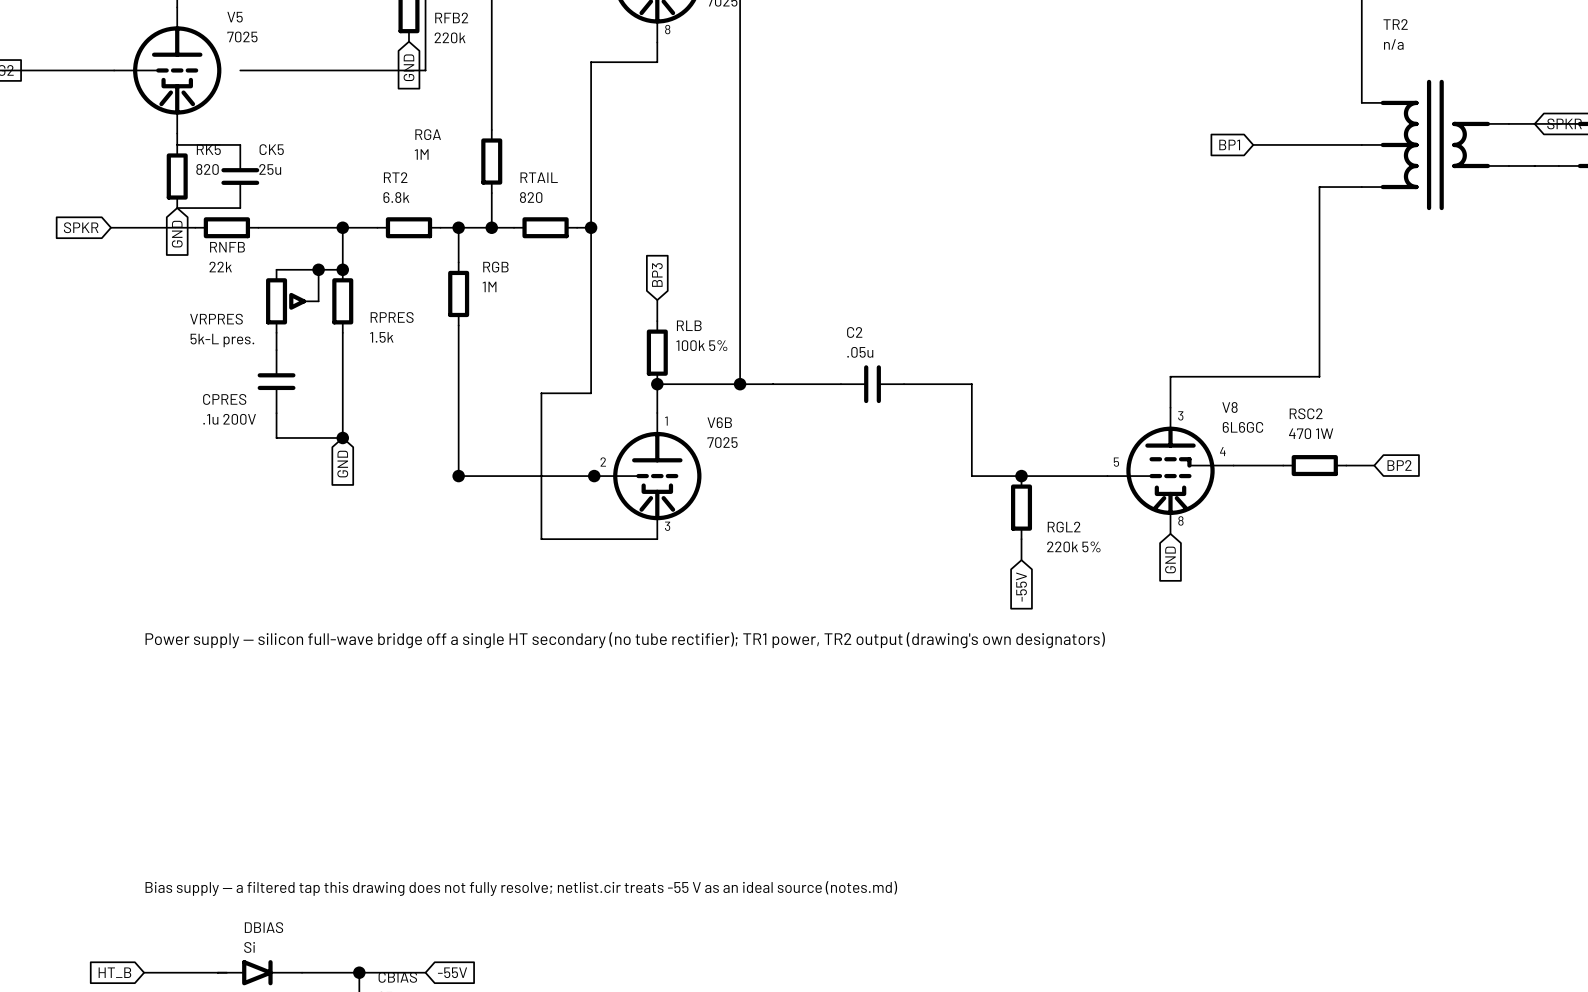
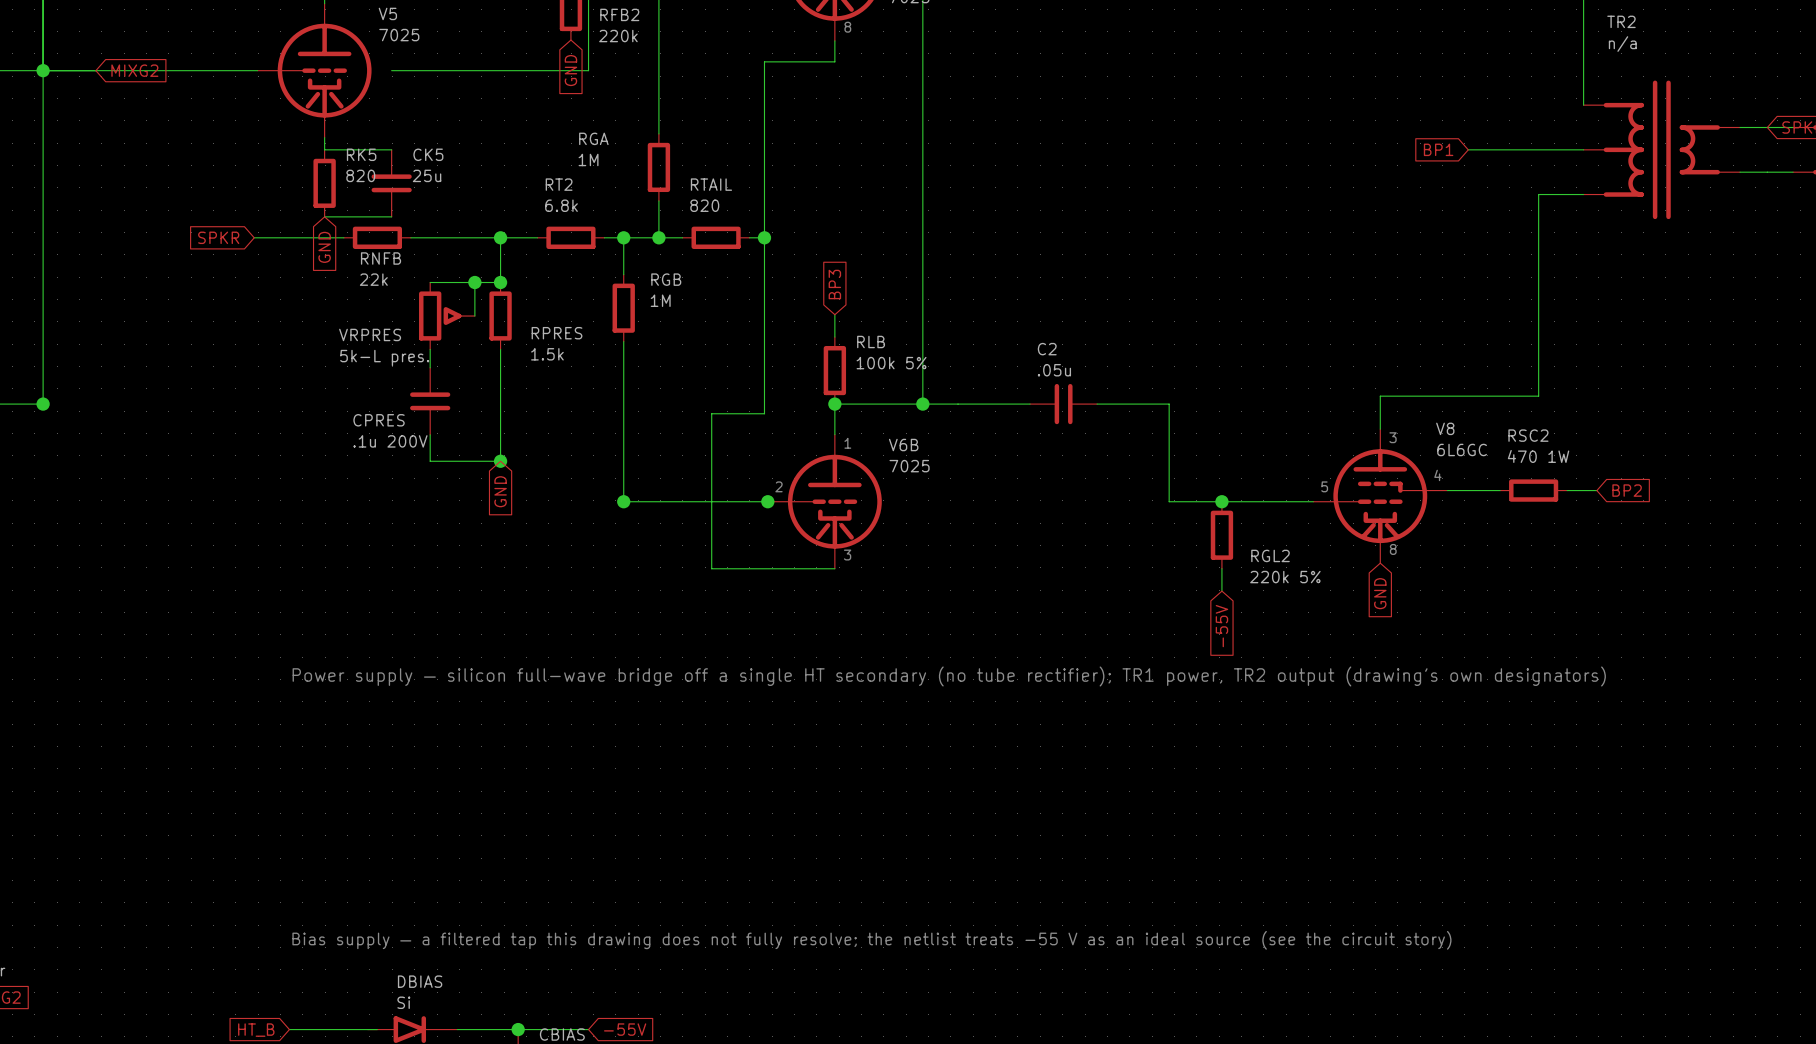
text: Bias supply — a filtered tap this drawing does not fully resolve; netlist.cir treats -55 V as an ideal source (notes.md) (521, 888) -> Bias supply — a filtered tap this drawing does not fully resolve; the netlist treats -55 V as an ideal source (see the circuit story) (871, 940)

